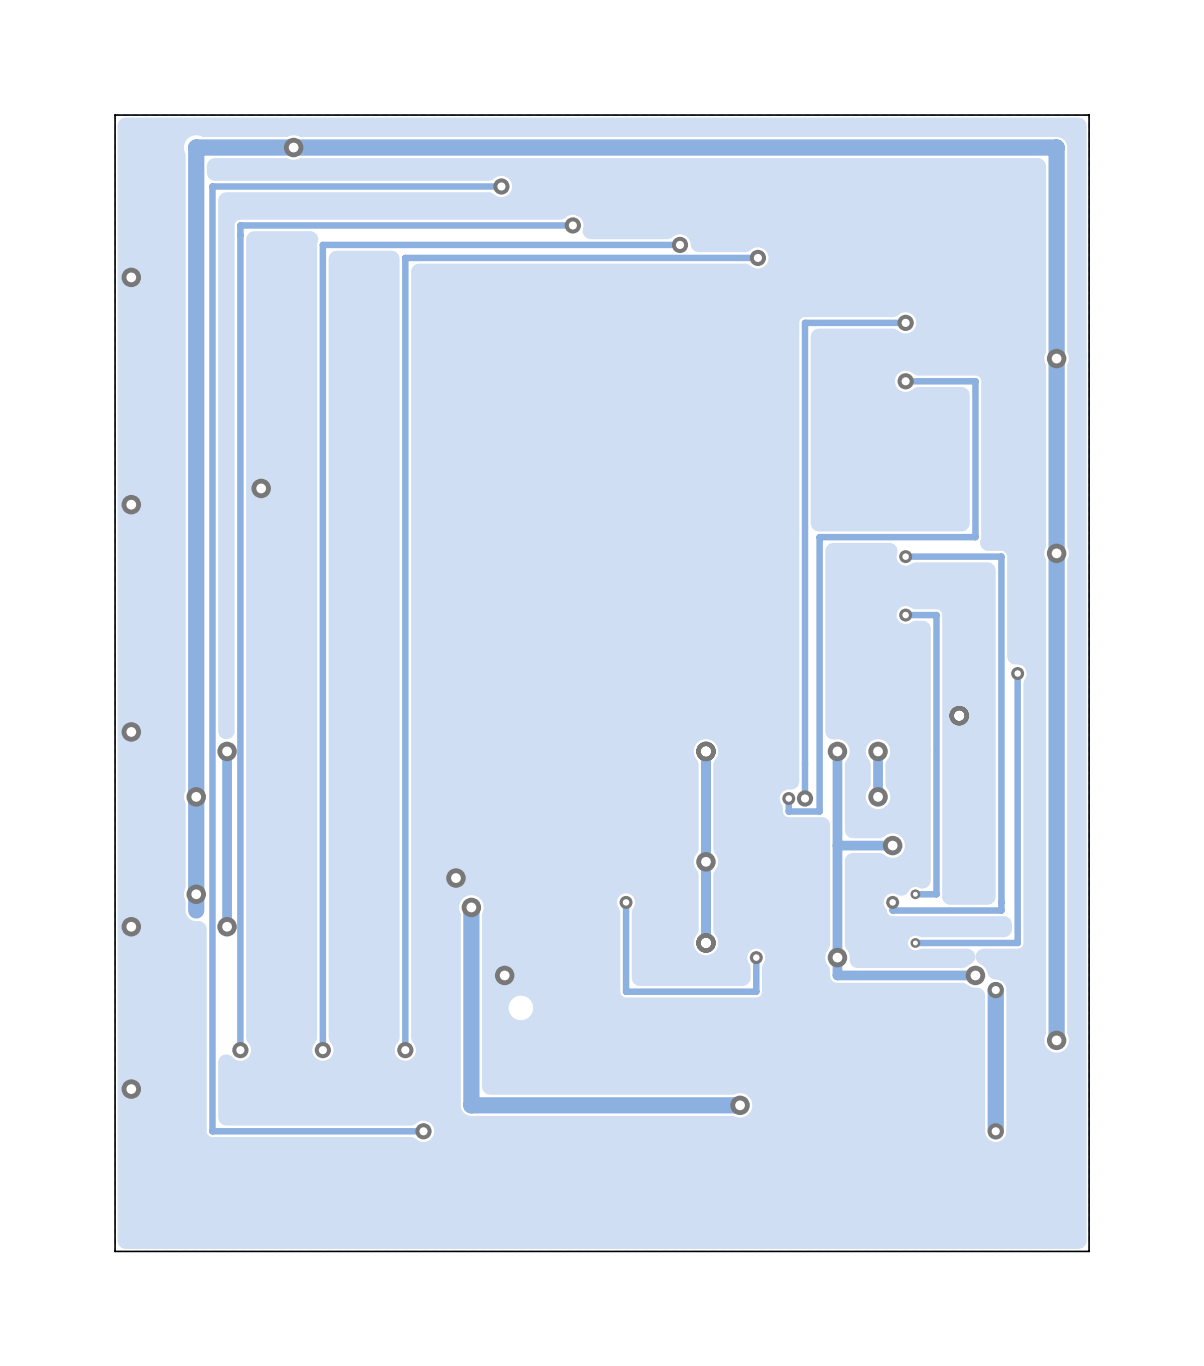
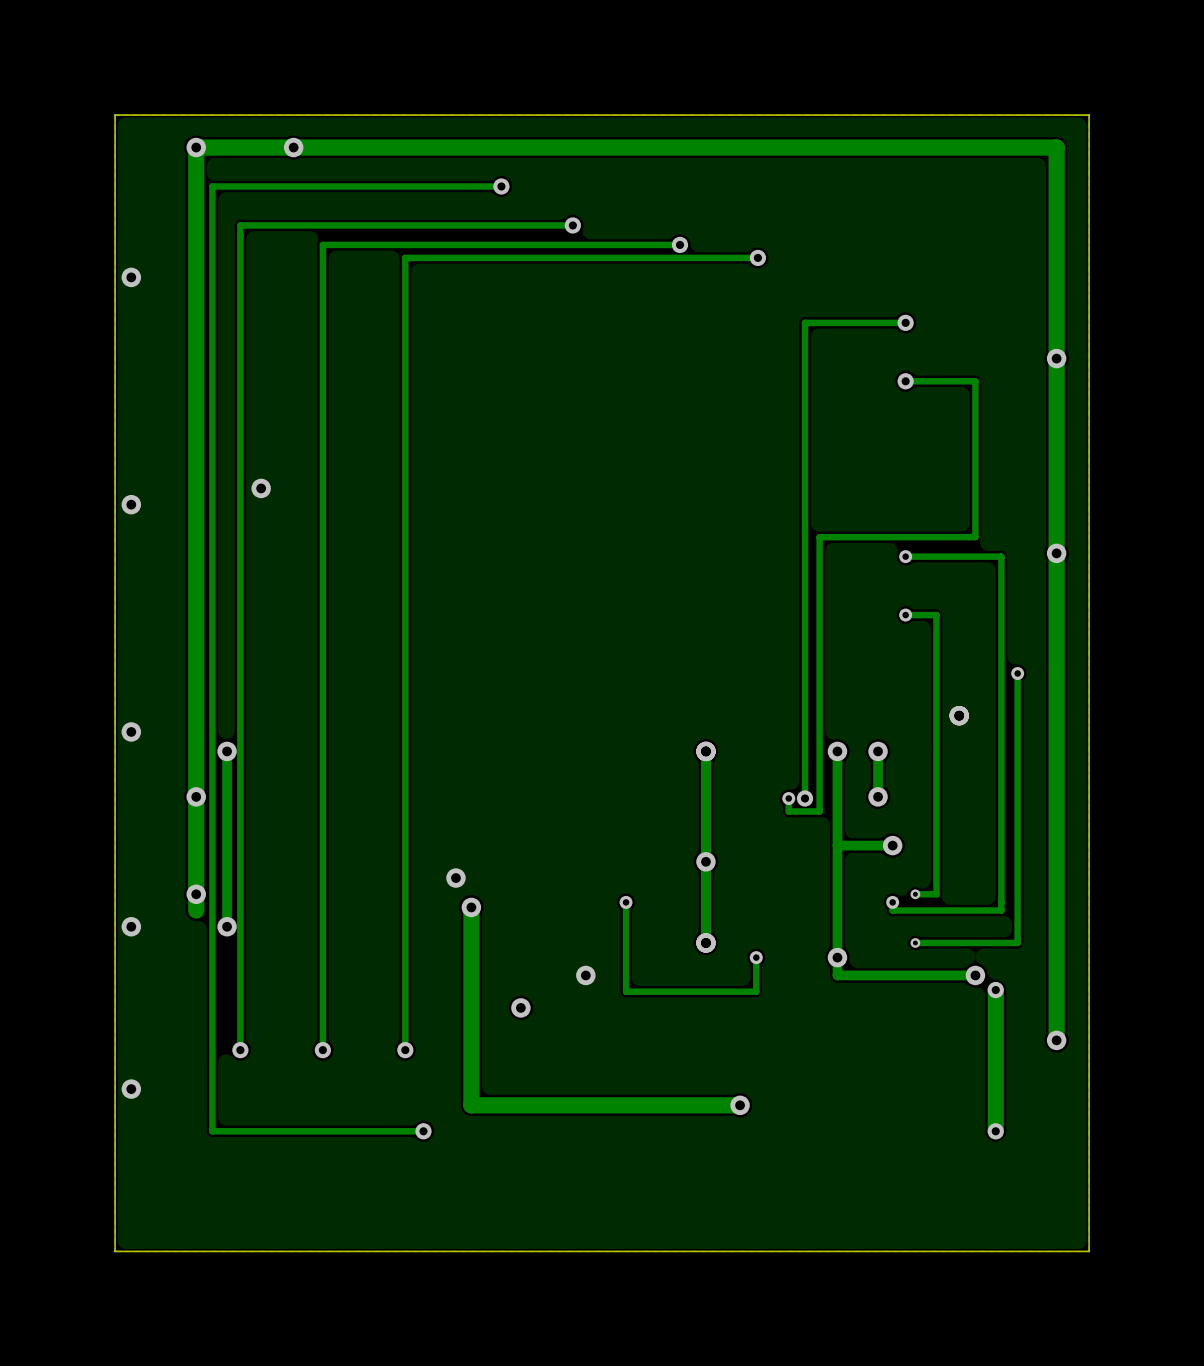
via: none -> (196, 147)
via position: (504, 975) -> (520, 1007)
via: none -> (585, 975)

